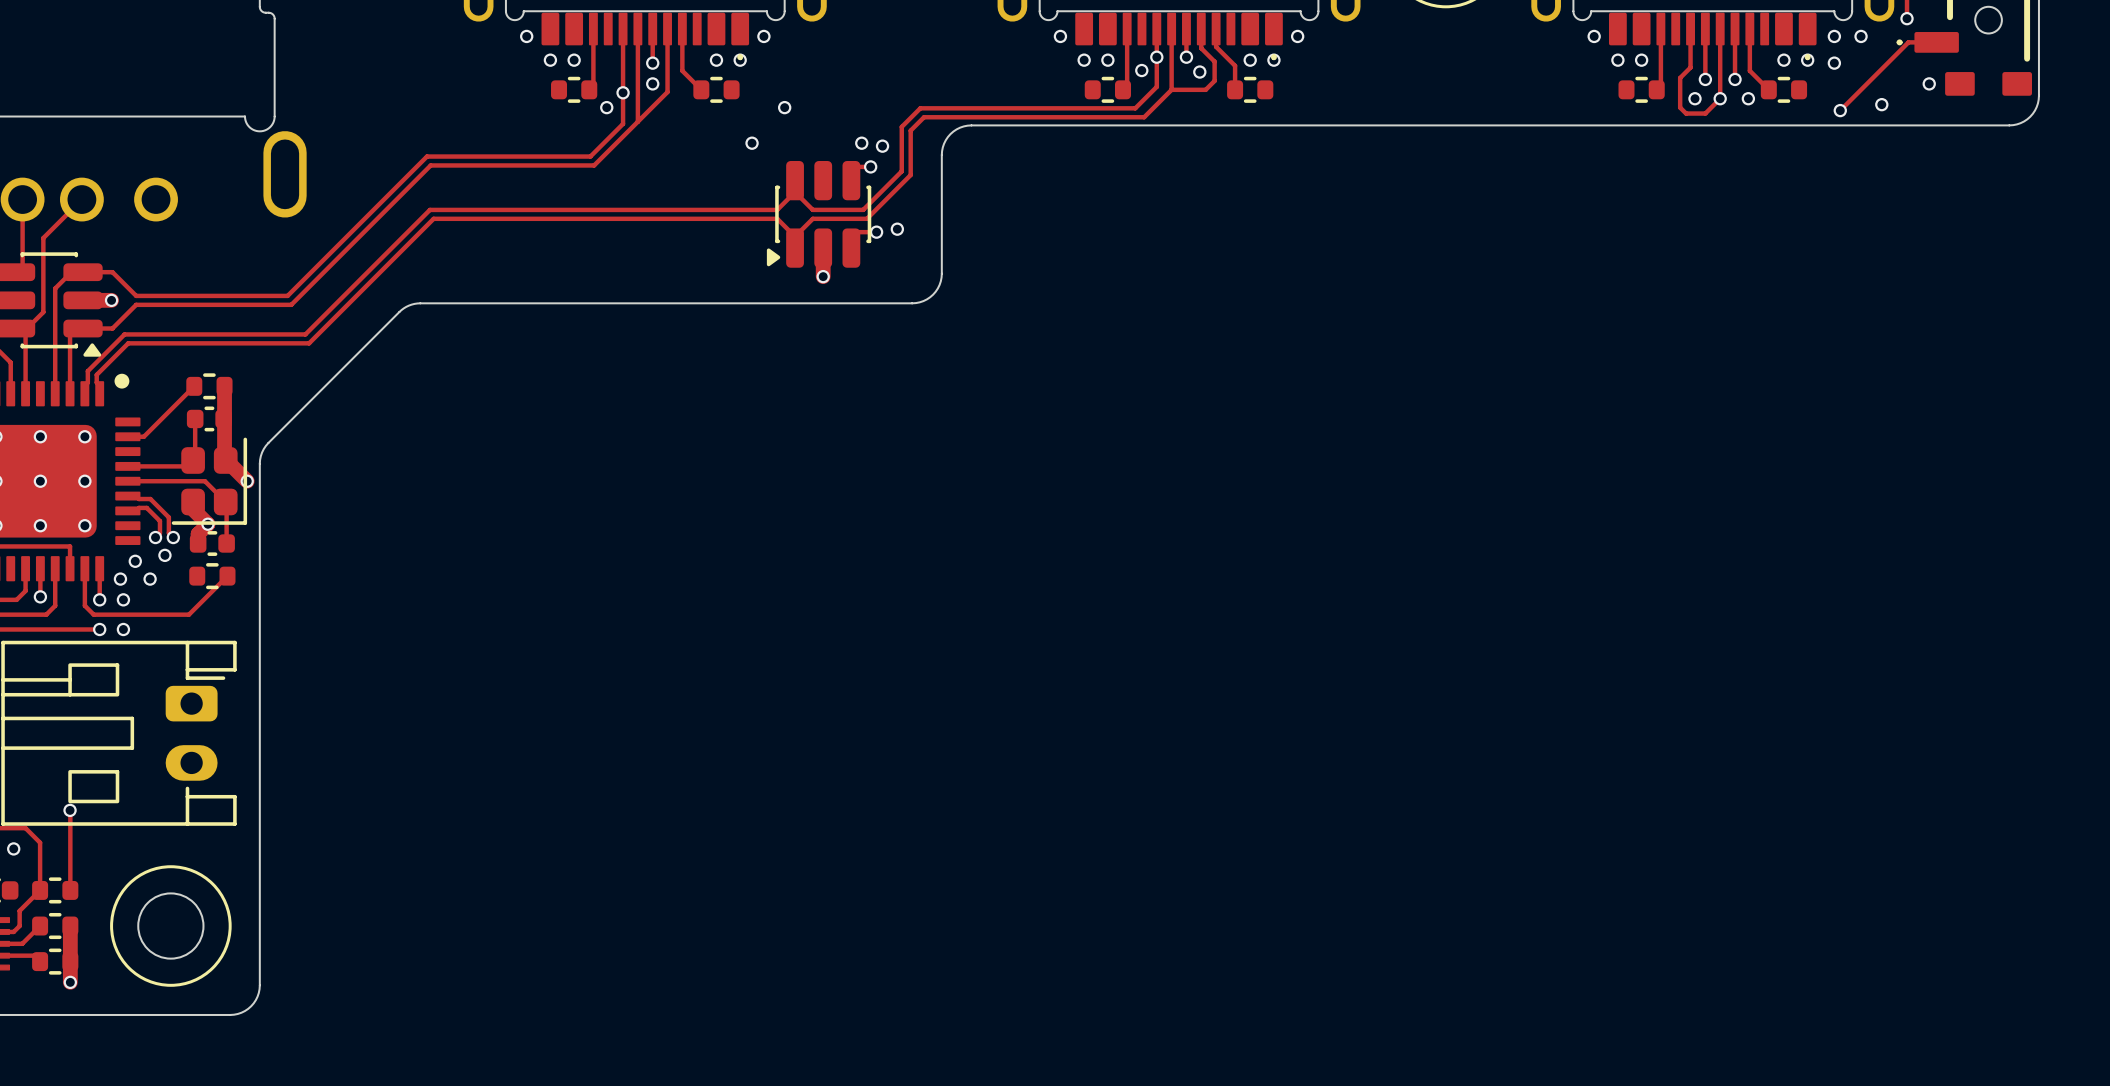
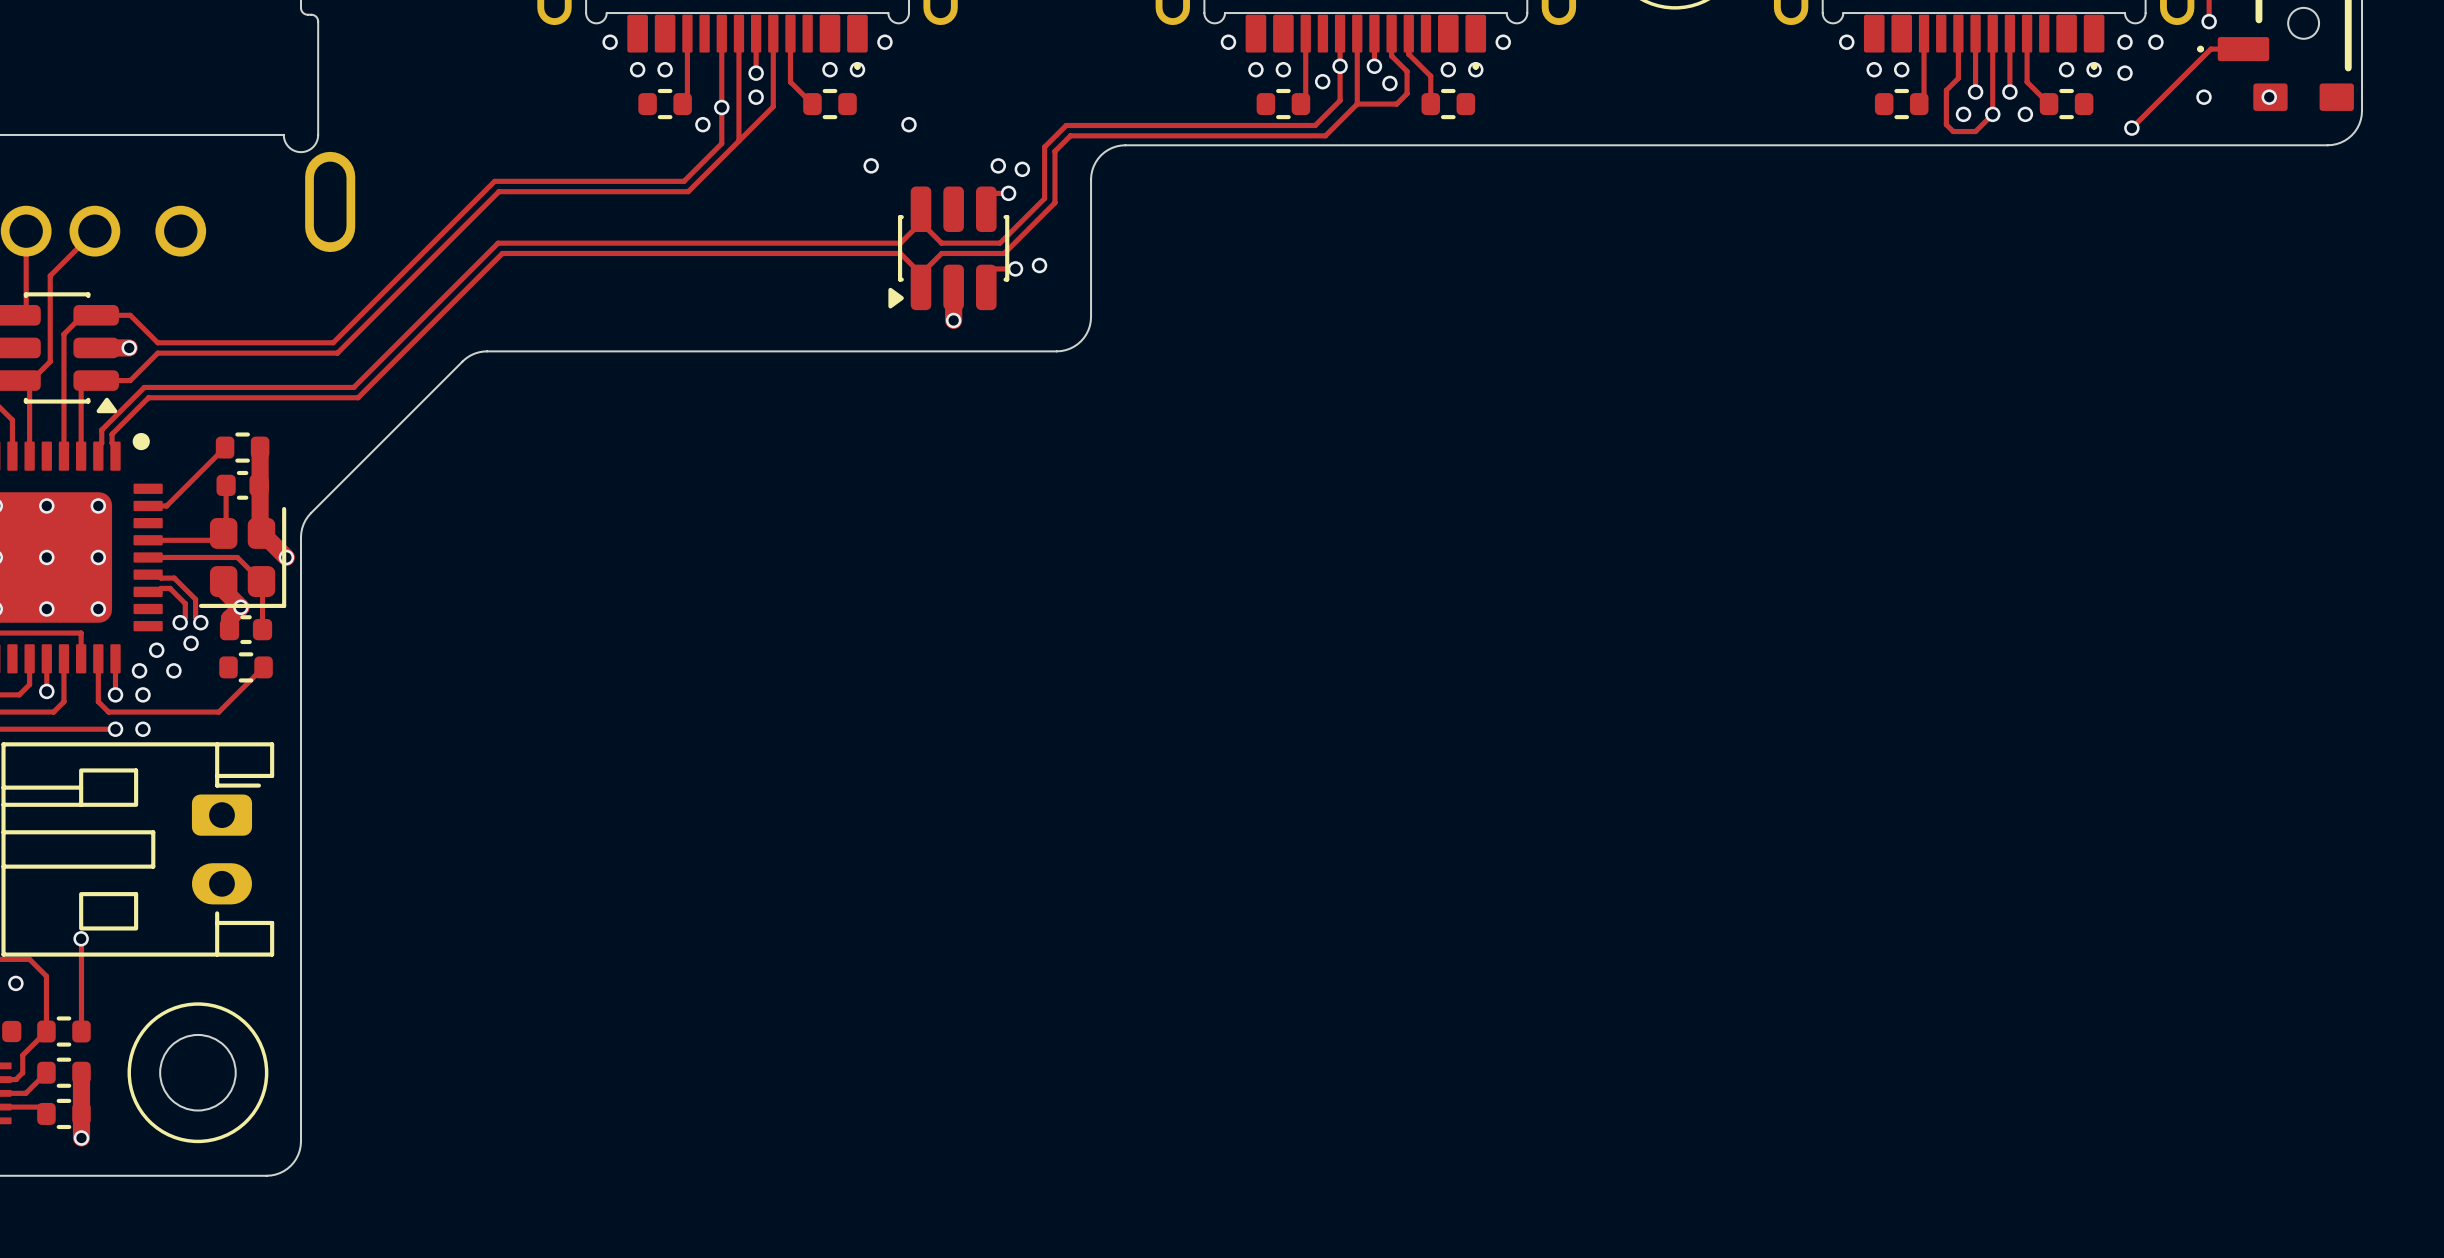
via: none -> (2204, 97)
via: (1929, 83) -> none
via: none -> (2269, 97)
via: (1881, 104) -> none

